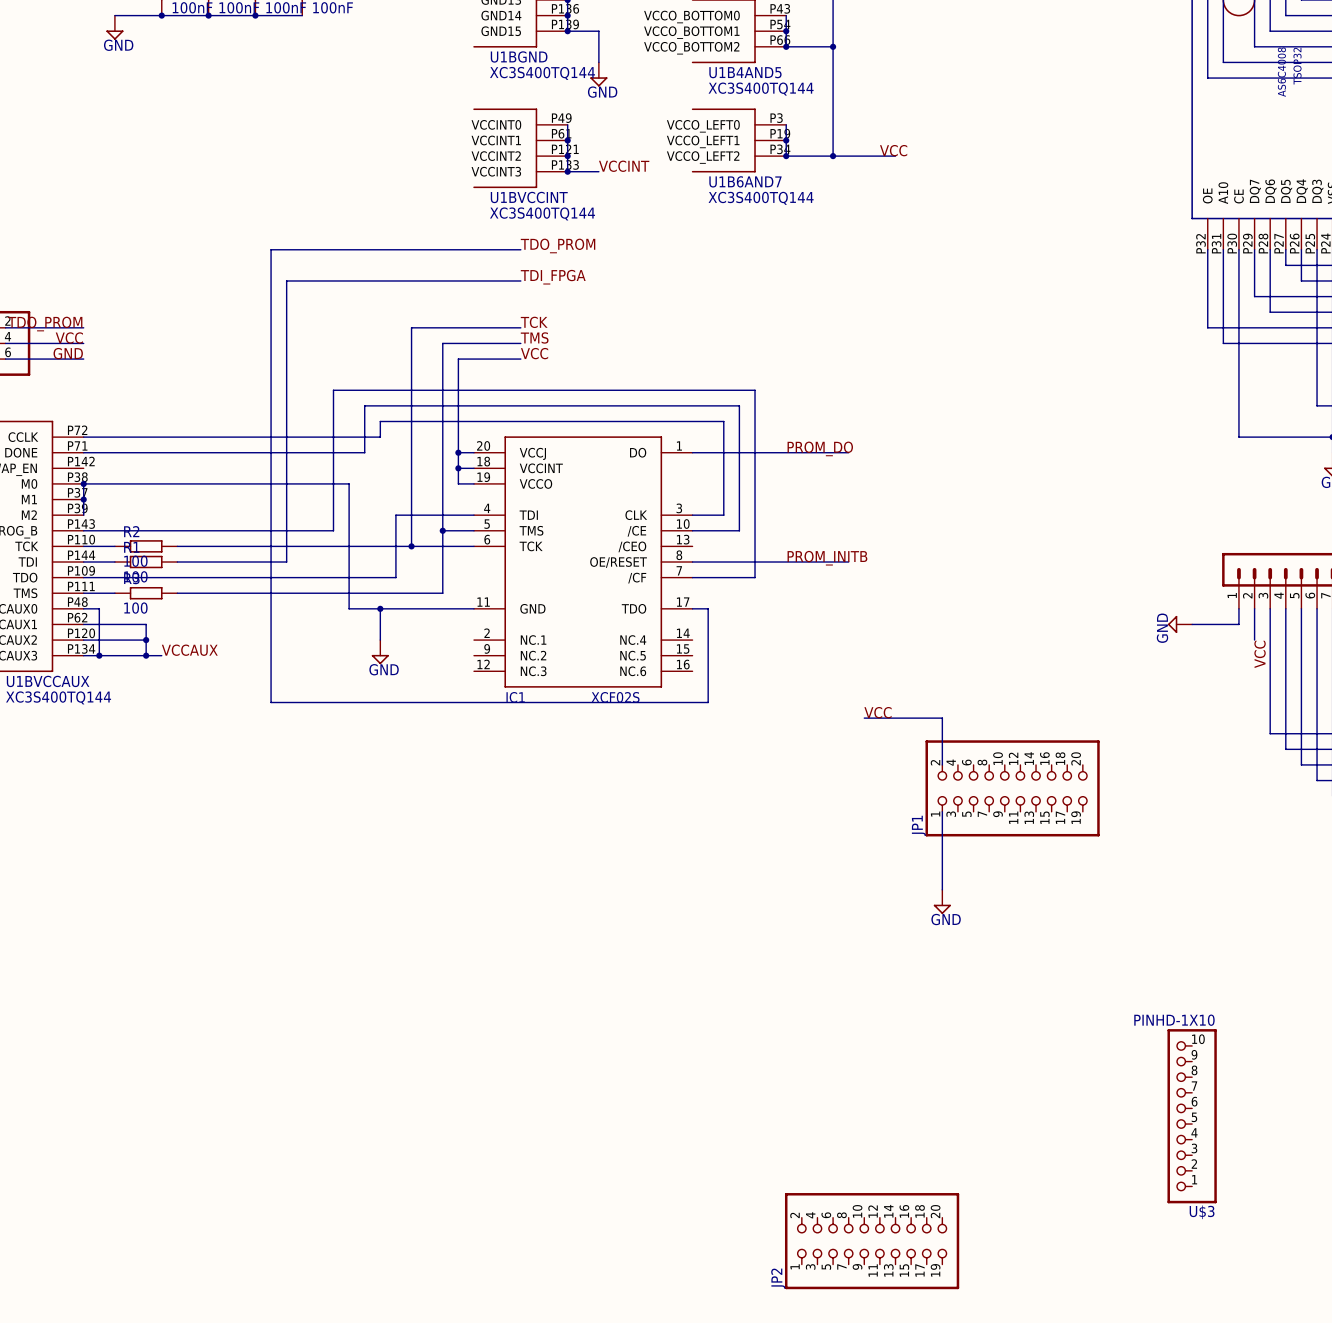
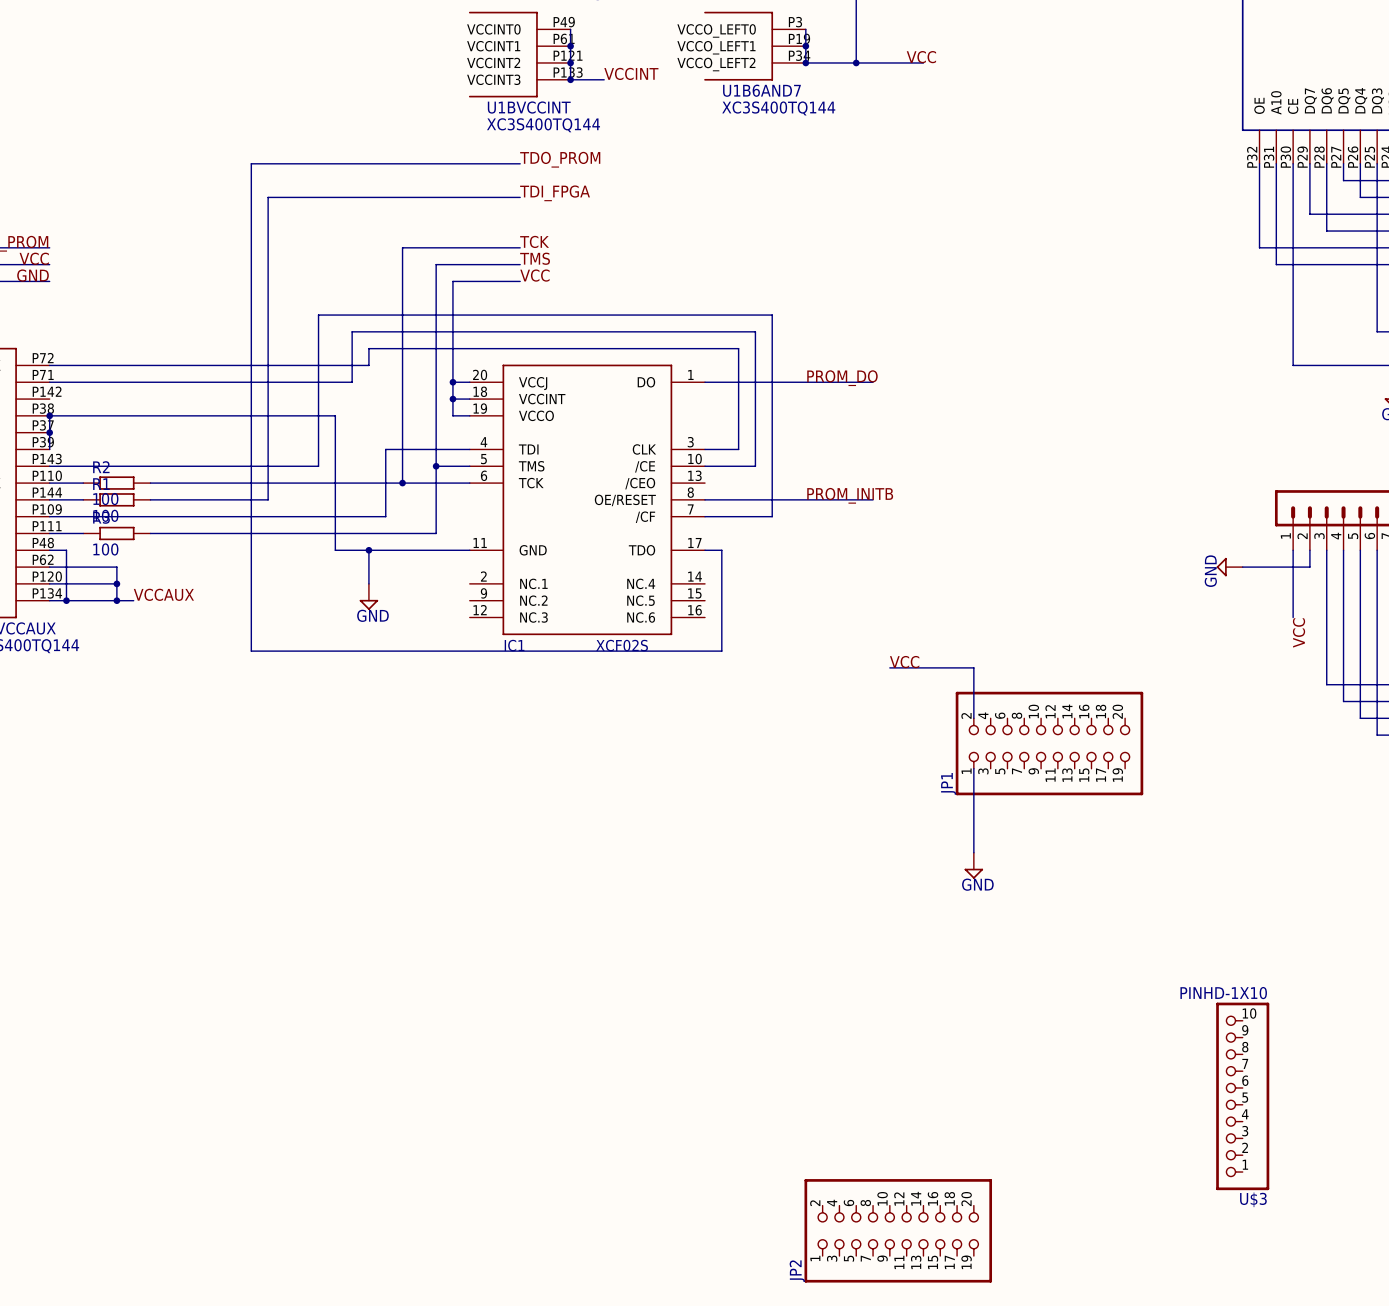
wire: (1254, 624) (1254, 640) -> (1309, 567) (1293, 567) (1293, 617)
label position: VCC (1260, 654) -> VCC (1299, 632)

